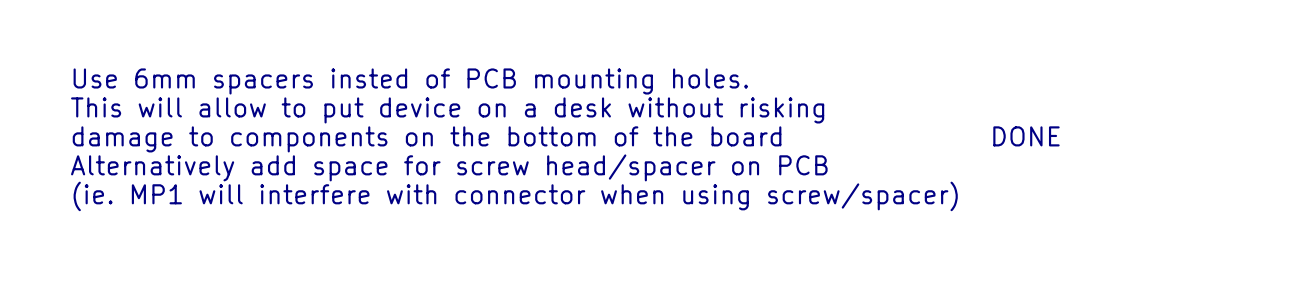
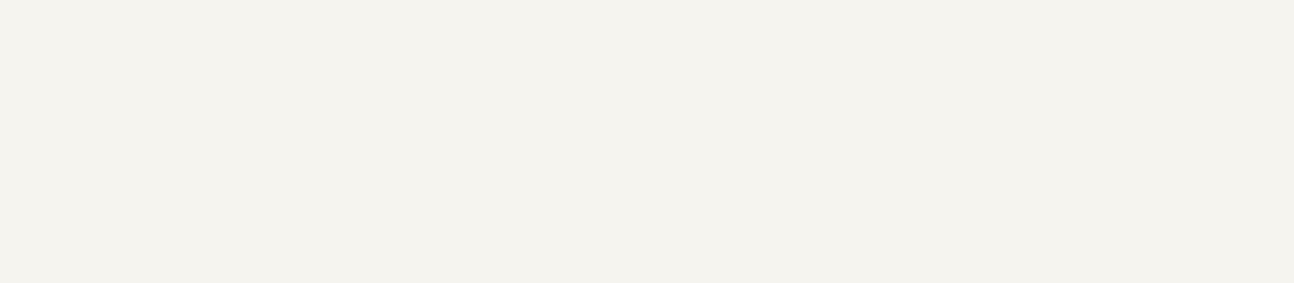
text: Use 6mm spacers insted of PCB mounting holes. (410, 81) -> none
text: This will allow to put device on a desk without risking (447, 110) -> none
text: damage to components on the bottom of the board DONE (566, 139) -> none
text: Alternatively add space for screw head/spacer on PCB (449, 167) -> none
text: (ie. MP1 will interfere with connector when using screw/spacer) (515, 196) -> none

